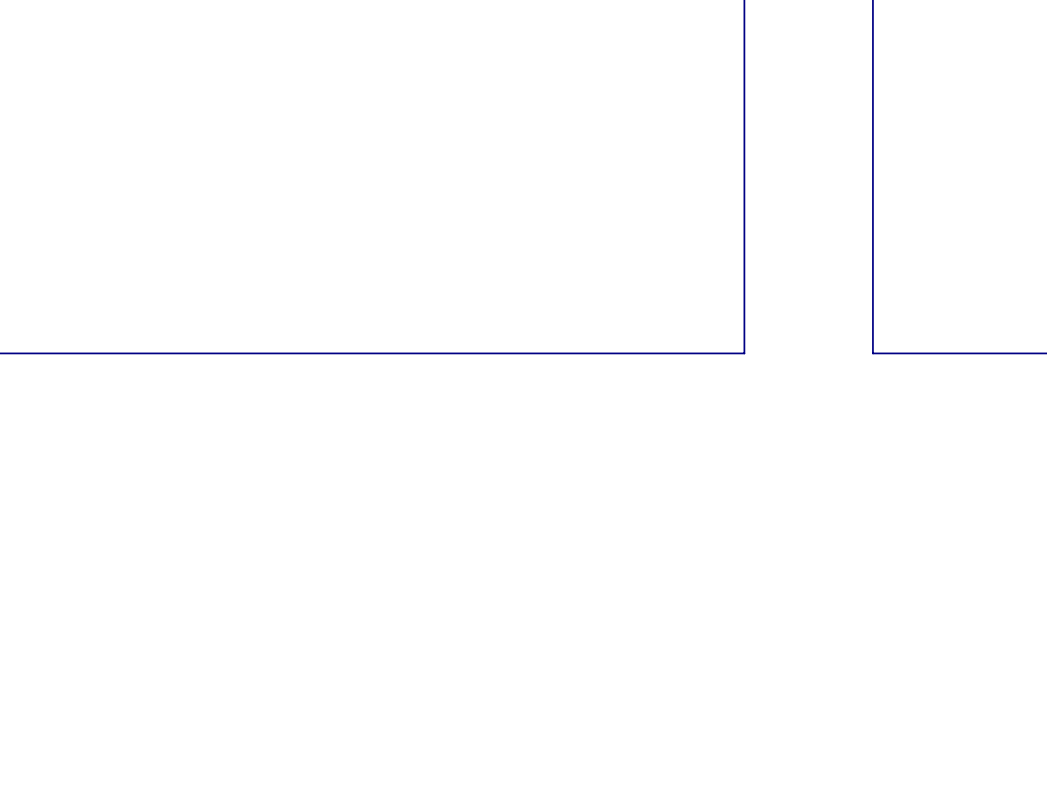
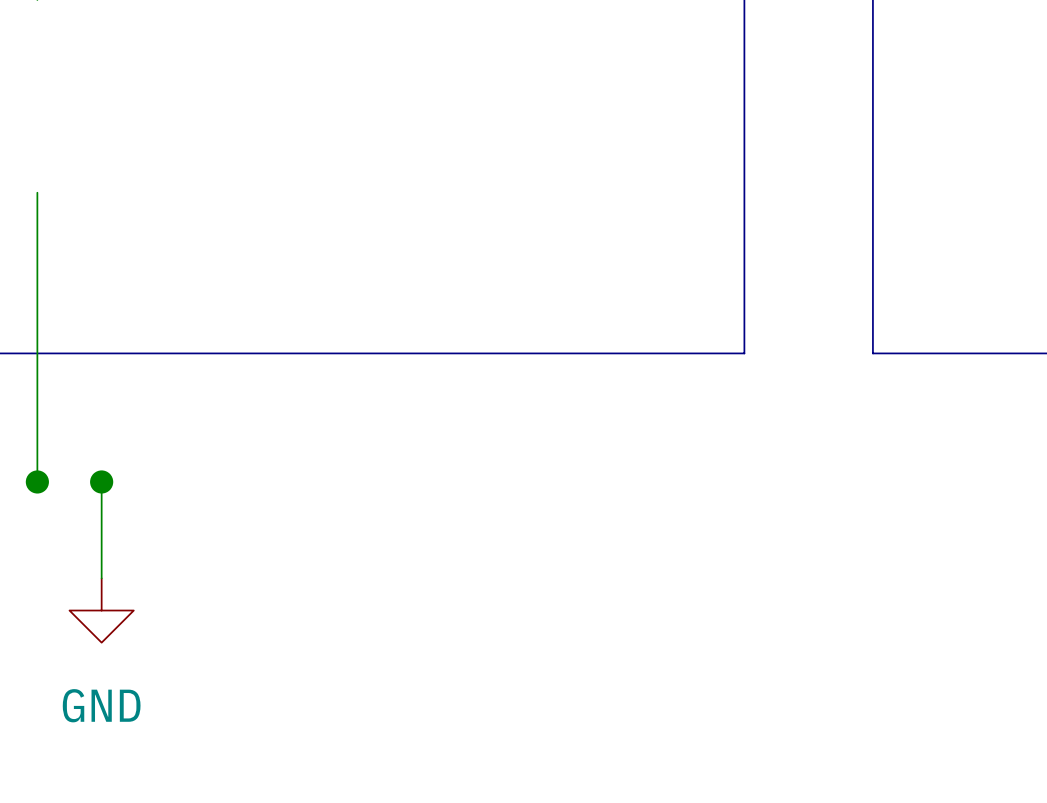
wire: none -> (37, 192) (37, 481)
junction: none -> (37, 481)
wire: none -> (101, 481) (101, 578)
junction: none -> (101, 481)
power symbol: none -> GND (101, 610)

